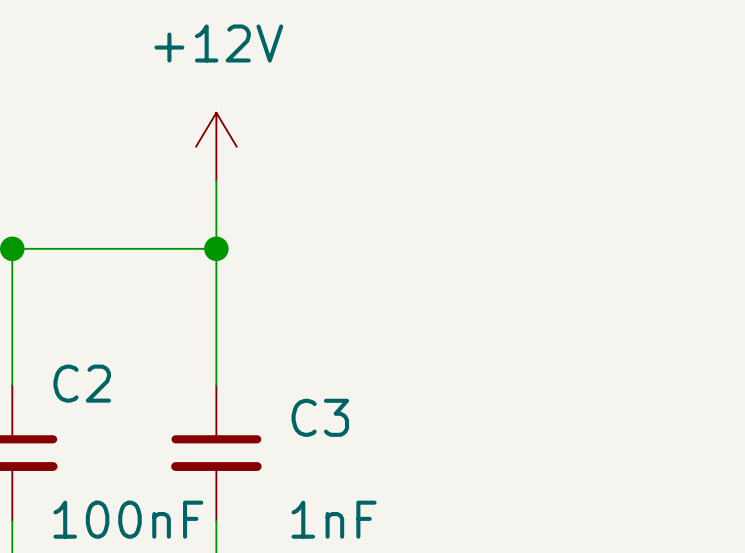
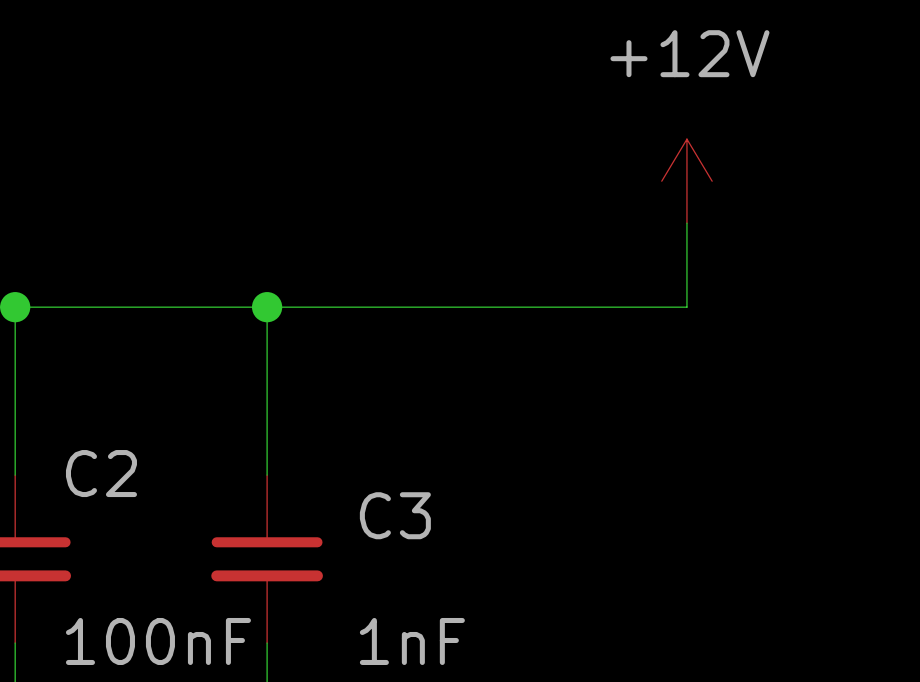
power symbol position: +12V (216, 146) -> +12V (686, 181)
wire: (216, 180) (216, 248) -> (686, 223) (686, 307) (267, 307)

